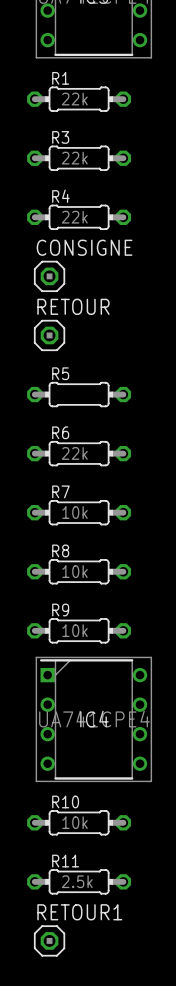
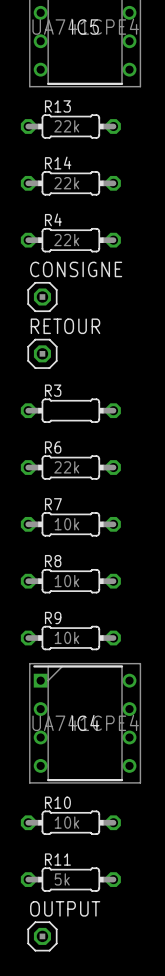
R1 name: R1 (60, 78) -> R13 (57, 106)
R3 name: R3 (60, 137) -> R14 (58, 163)
R5 name: R5 (60, 373) -> R3 (53, 390)
R11 value: 2.5k (77, 881) -> 5k (62, 879)
RETOUR1 name: RETOUR1 (79, 912) -> OUTPUT (65, 908)

